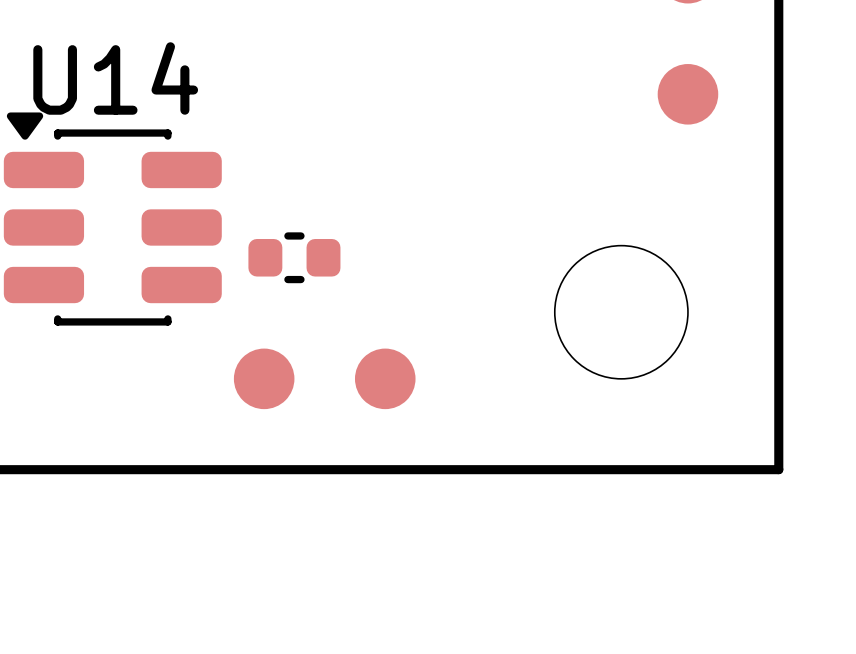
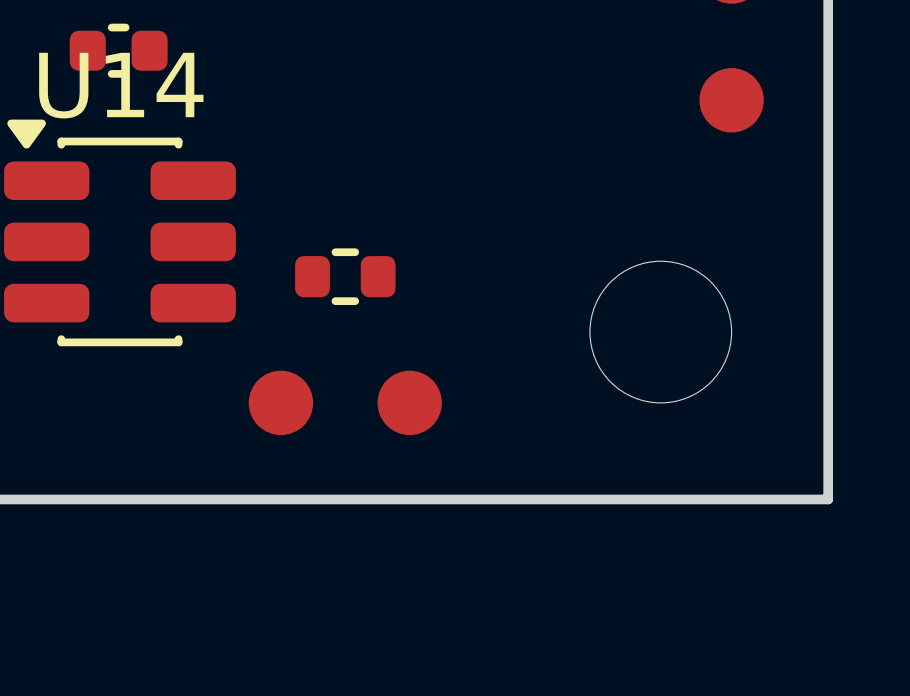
part: none -> (118, 50)
part footprint: [248, 232, 341, 284] -> [295, 248, 396, 306]

